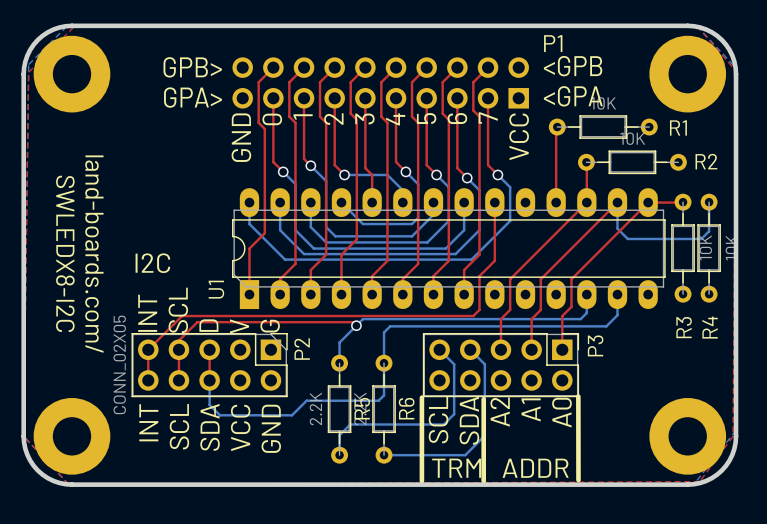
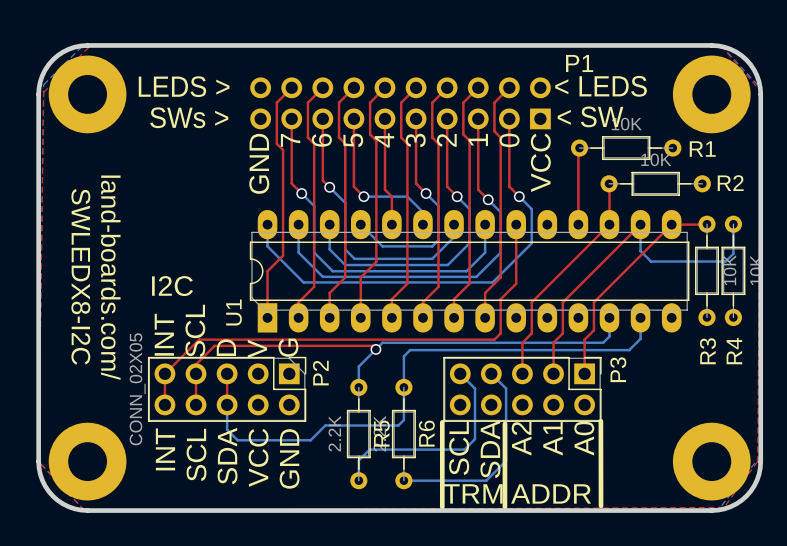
text: none -> LEDS > (184, 86)
text: <GPB (573, 66) -> < LEDS (601, 86)
text: GPB> (192, 67) -> none
text: <GPA (573, 96) -> < SW (590, 116)
text: none -> SWs > (189, 117)
text: GPA> (192, 97) -> none
text: 1 (303, 116) -> 6 (321, 140)
text: 7 (488, 117) -> 0 (509, 140)
text: 3 (364, 118) -> 4 (384, 140)
text: 5 (426, 118) -> 2 (446, 140)
text: 6 (457, 118) -> 1 (478, 139)
text: 0 (272, 119) -> 7 (290, 140)
text: 2 (333, 119) -> 5 (353, 140)
text: 4 (395, 119) -> 3 (415, 140)

